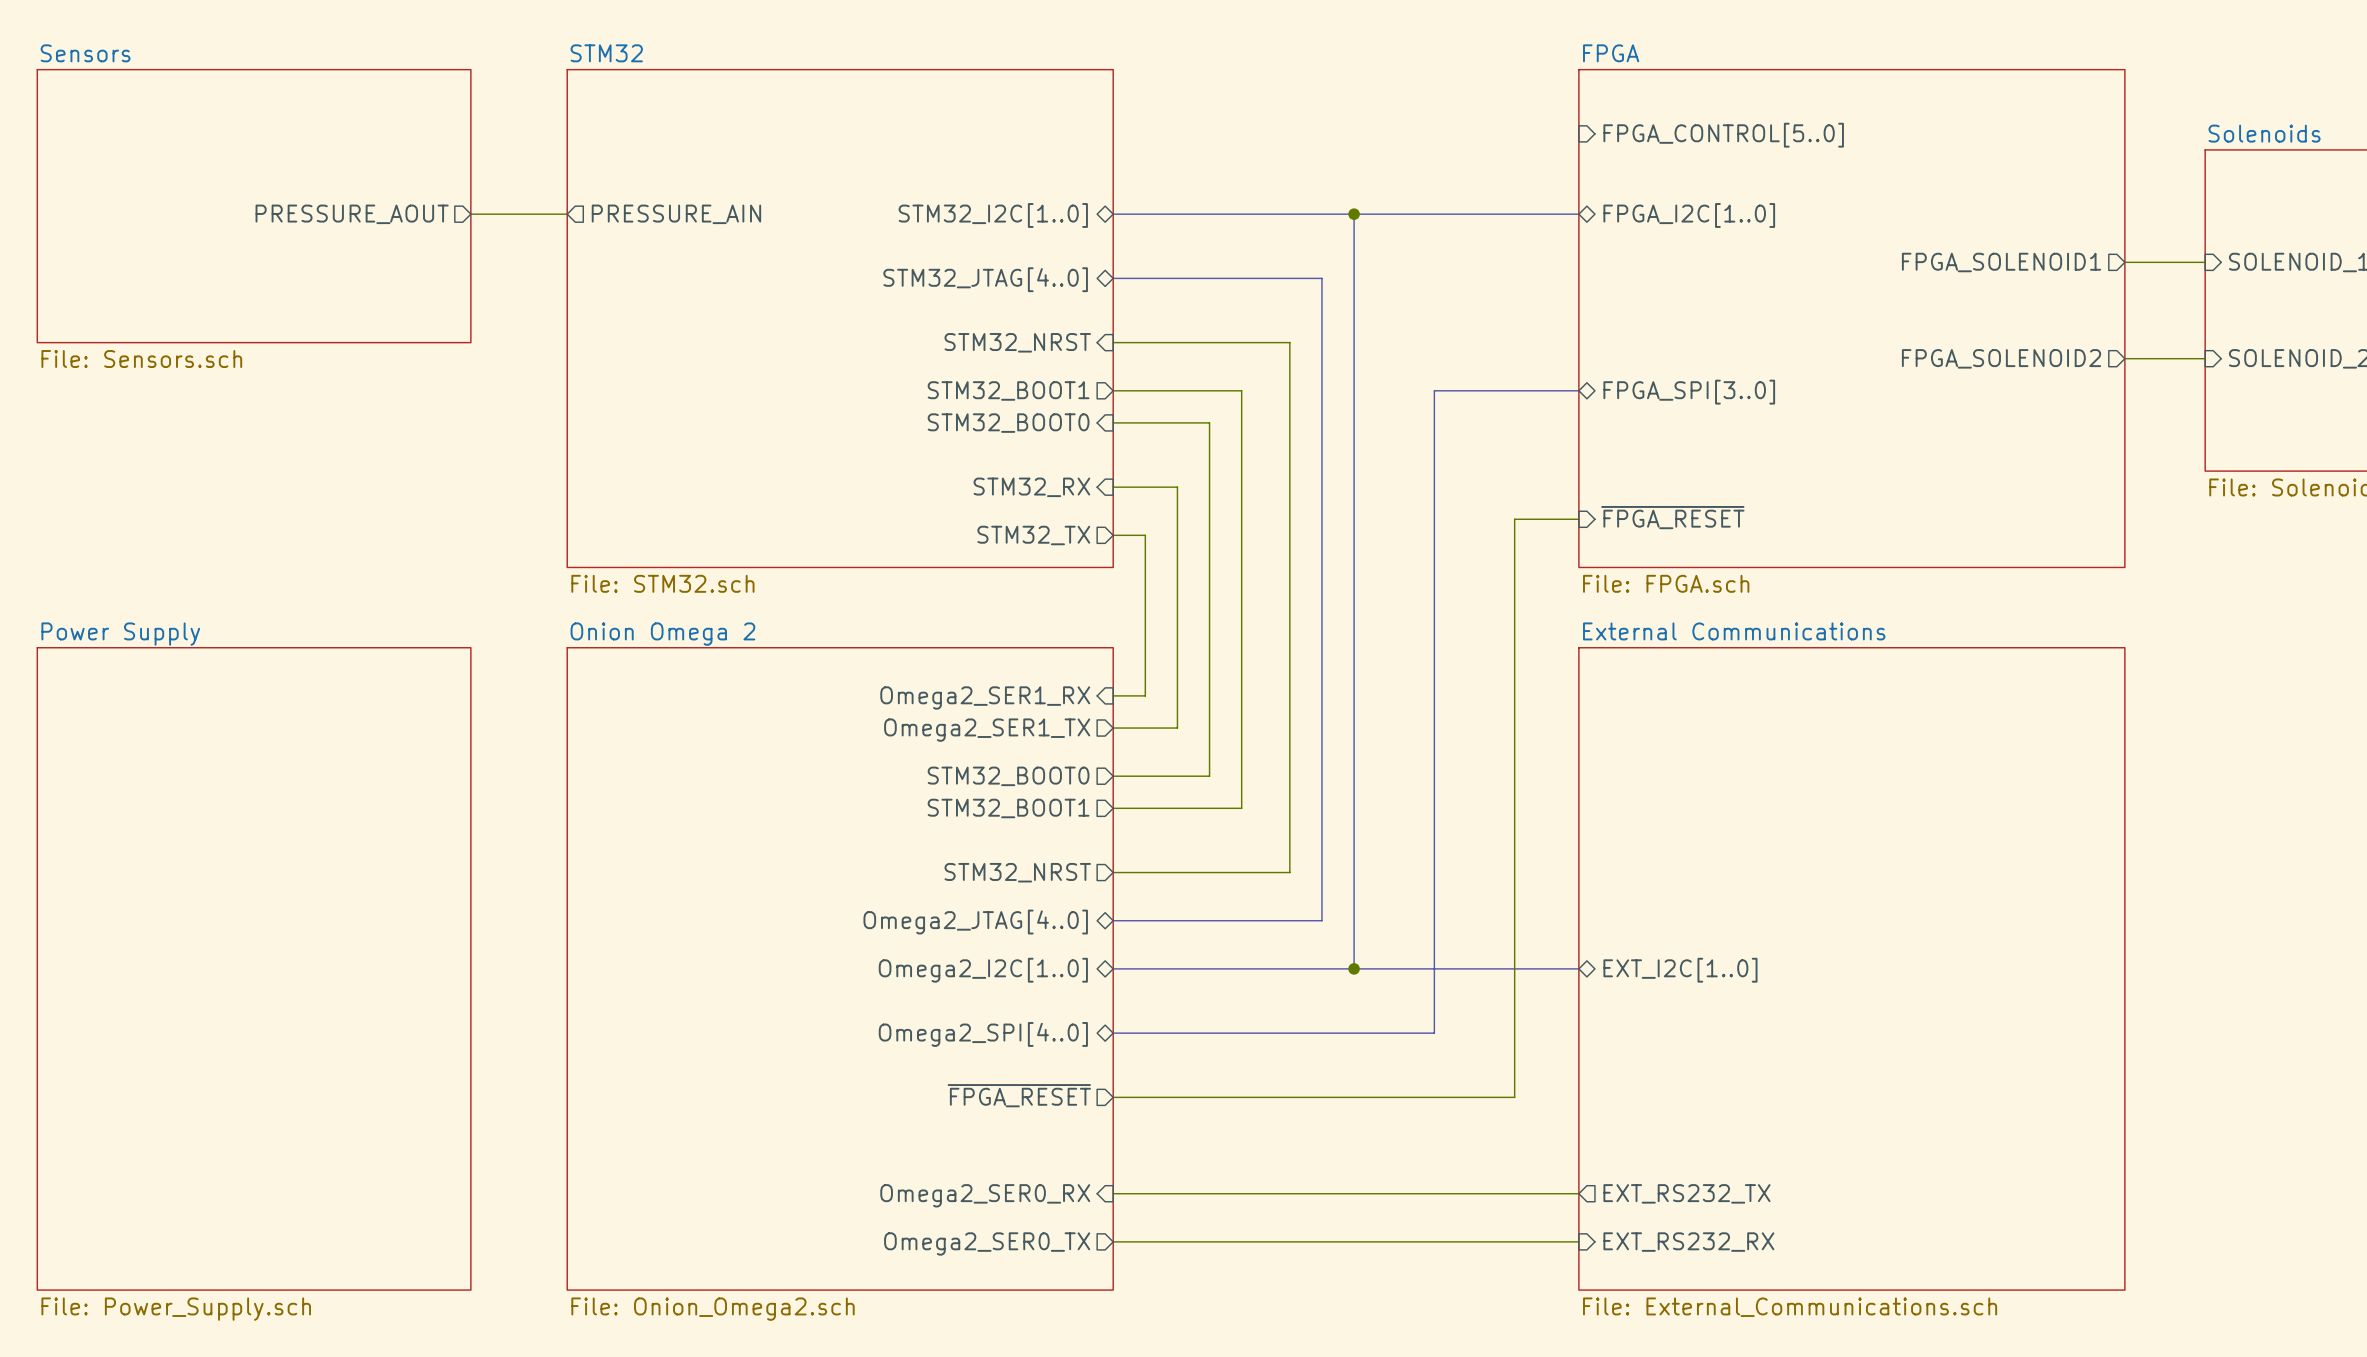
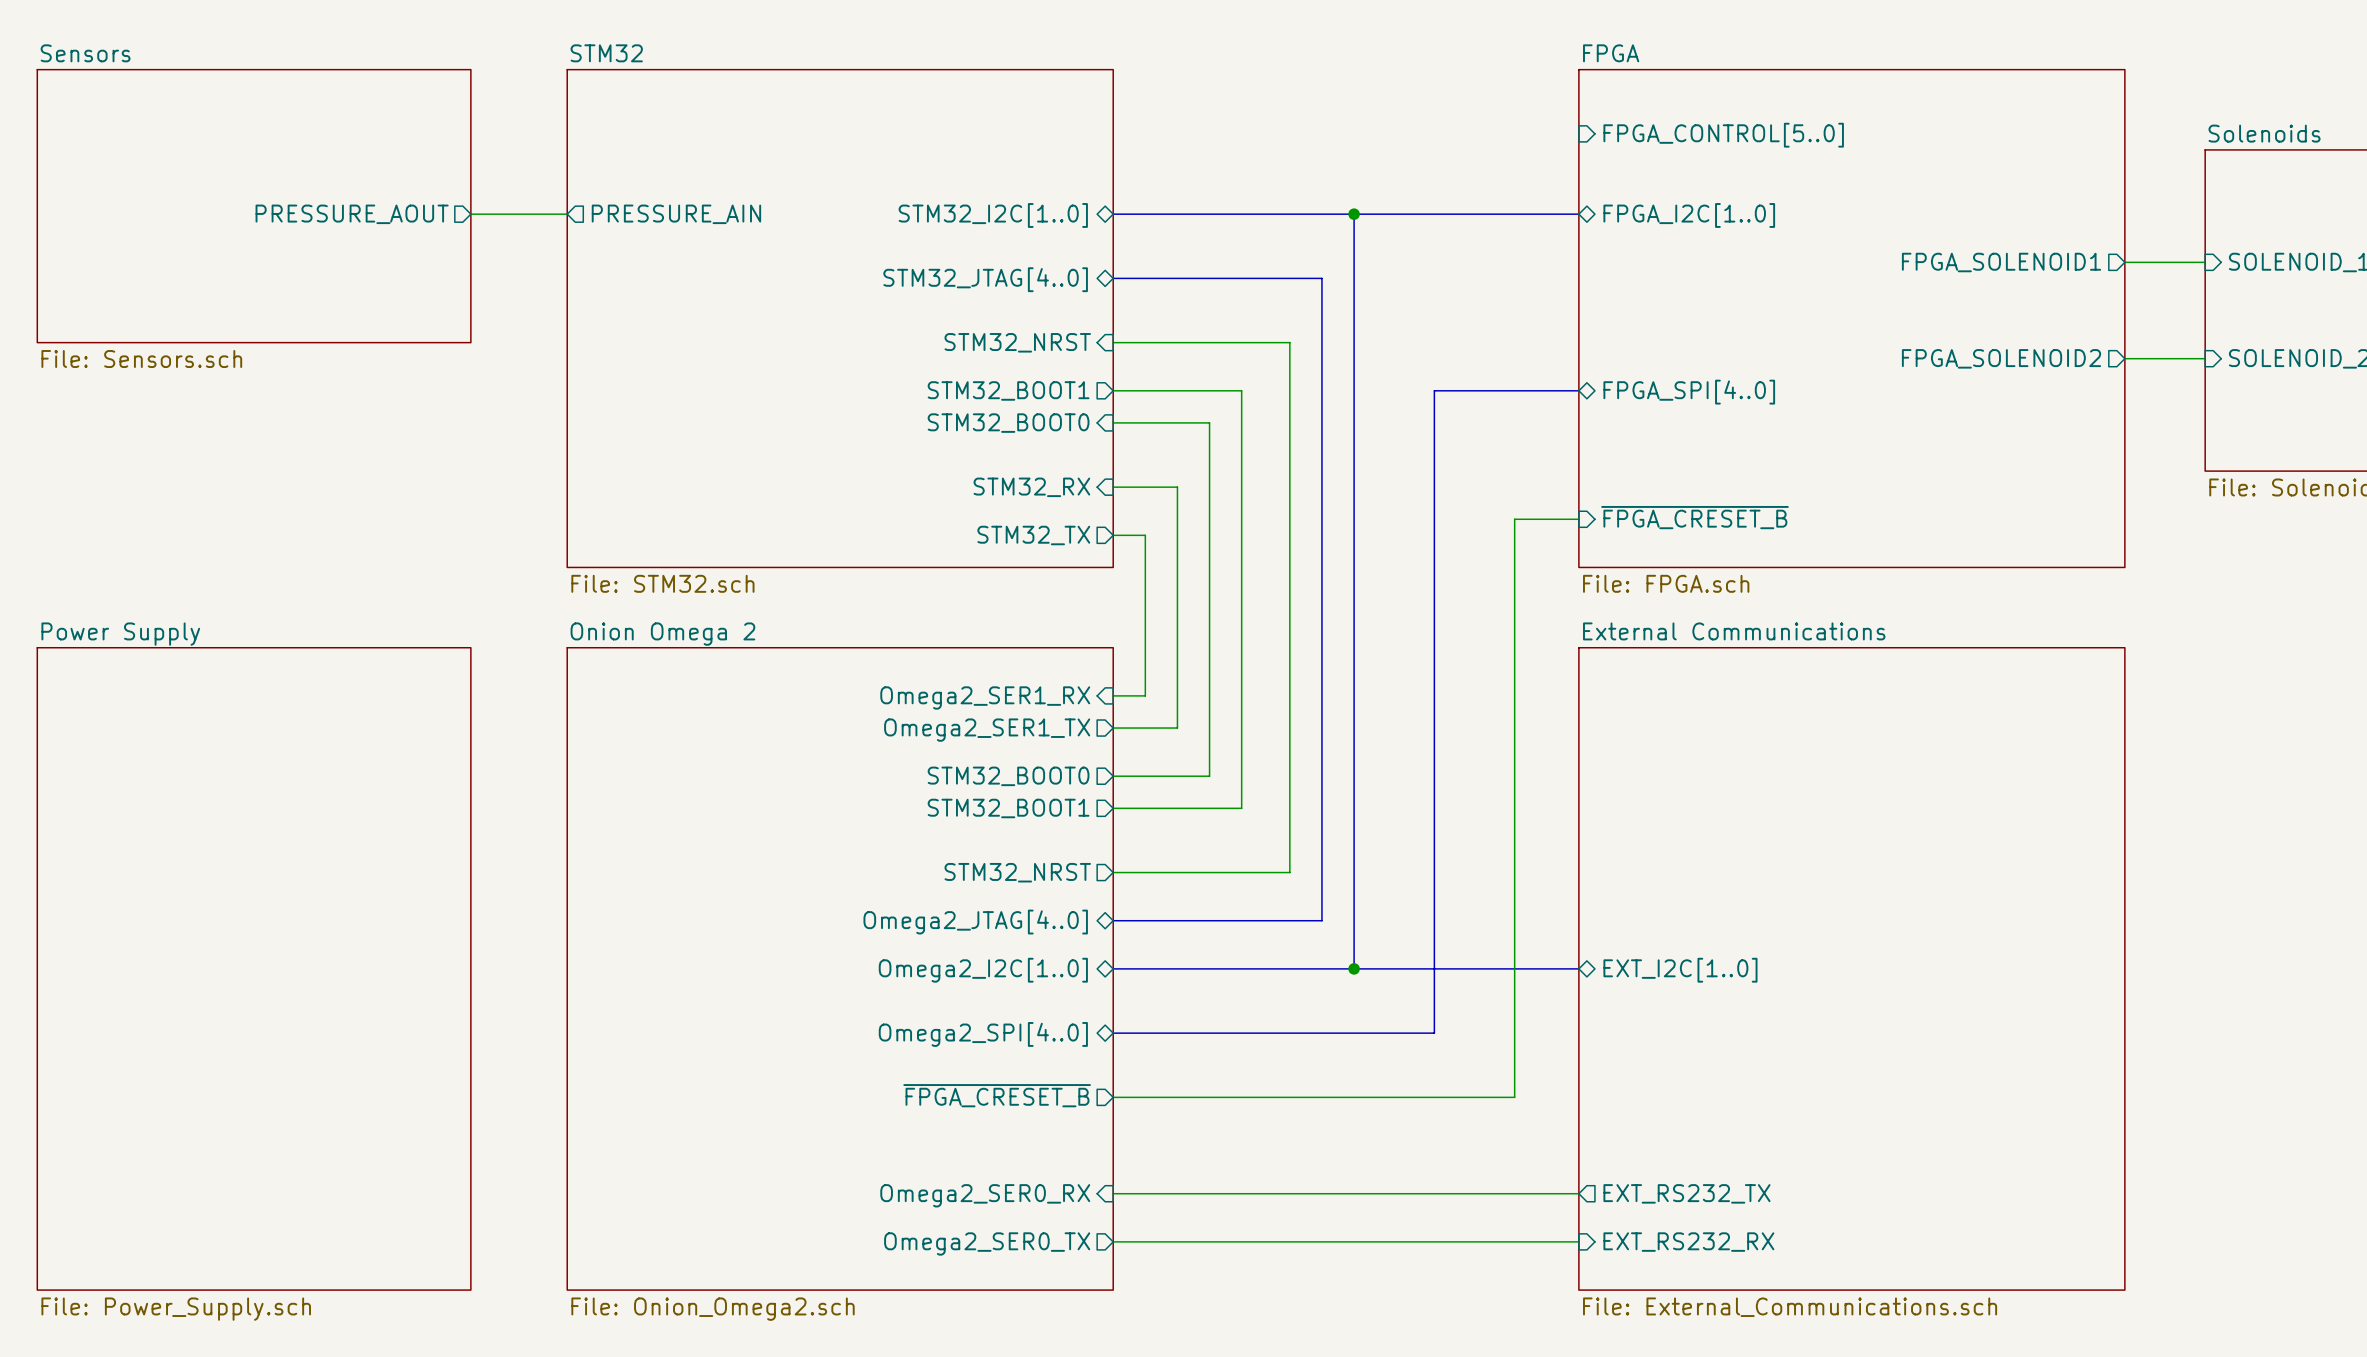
sheet pin: FPGA_SPI[3..0] (1689, 392) -> FPGA_SPI[4..0] (1689, 392)
sheet pin: ~{FPGA_RESET} (1672, 517) -> ~{FPGA_CRESET_B} (1694, 517)
sheet pin: ~{FPGA_RESET} (1019, 1095) -> ~{FPGA_CRESET_B} (997, 1095)

